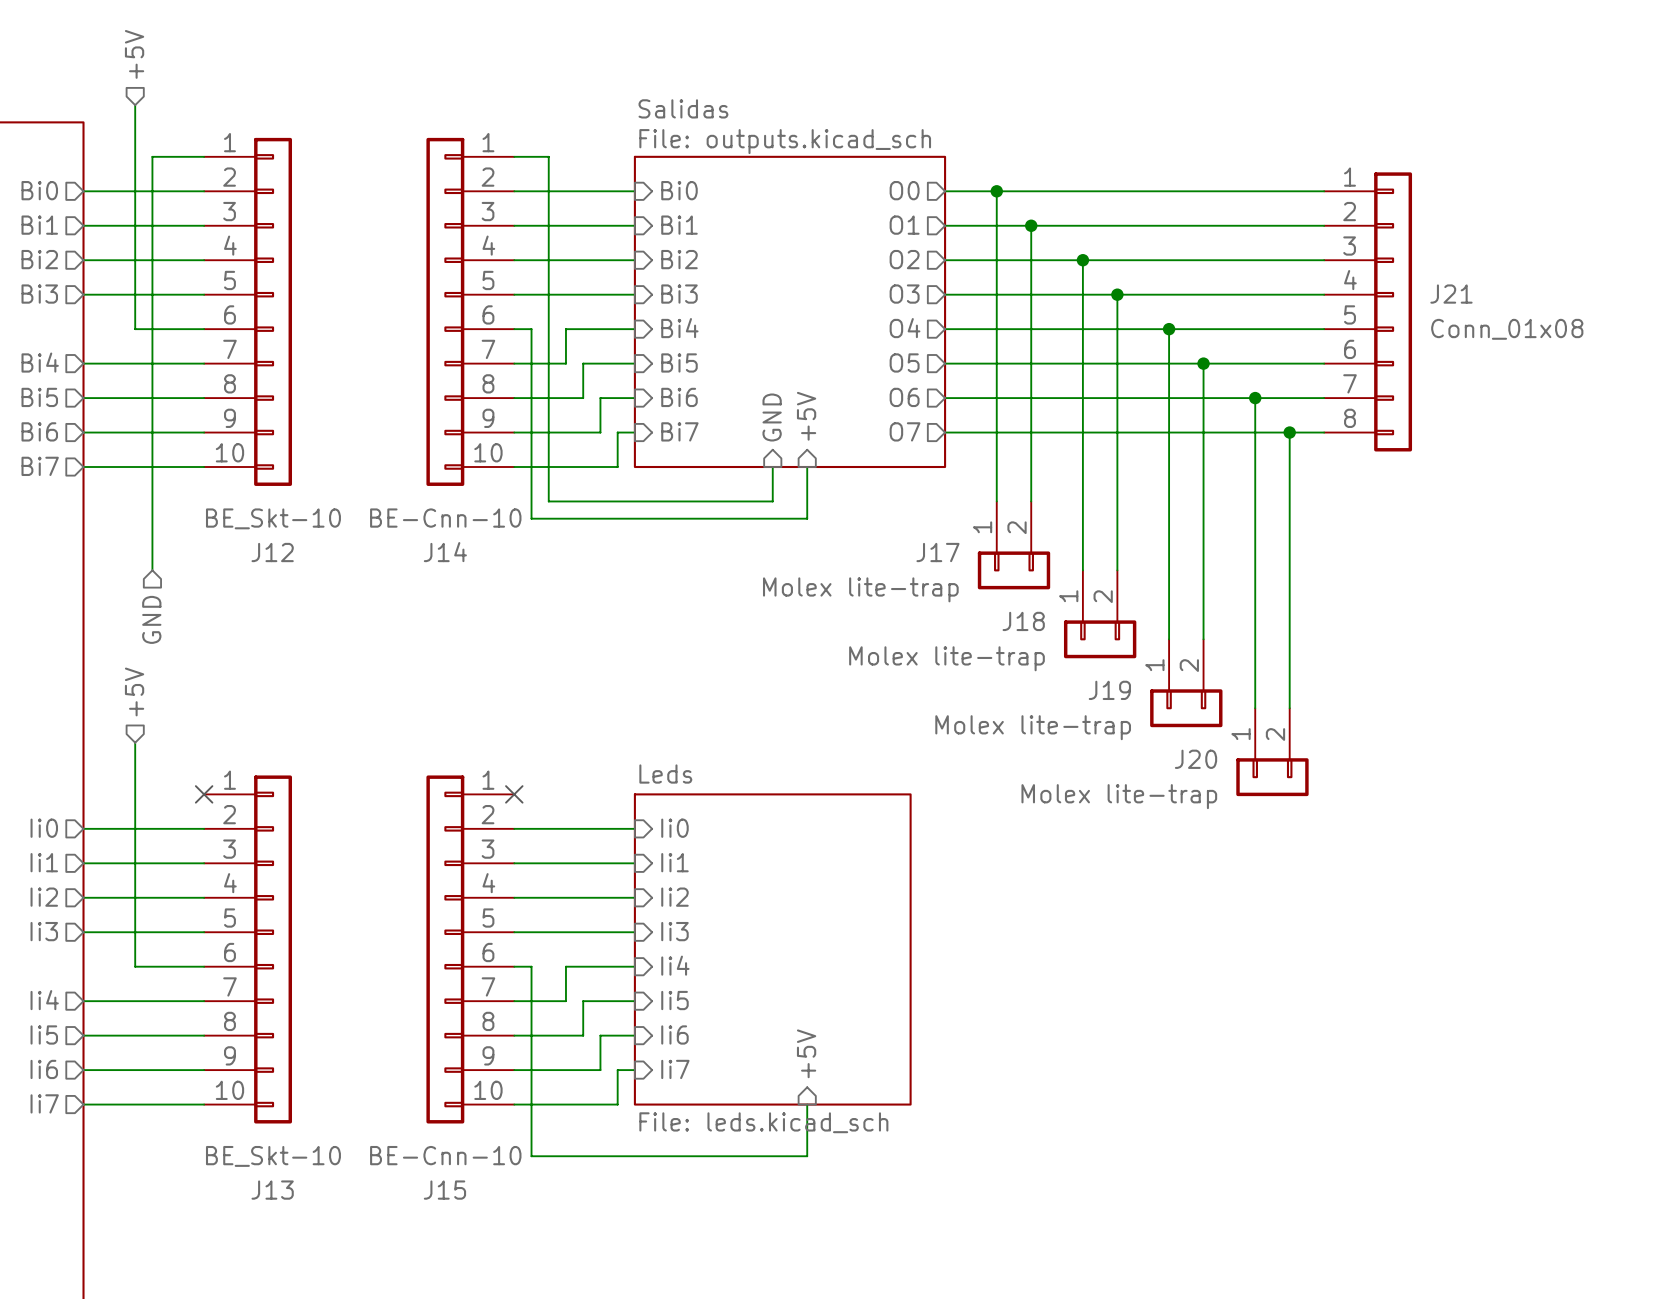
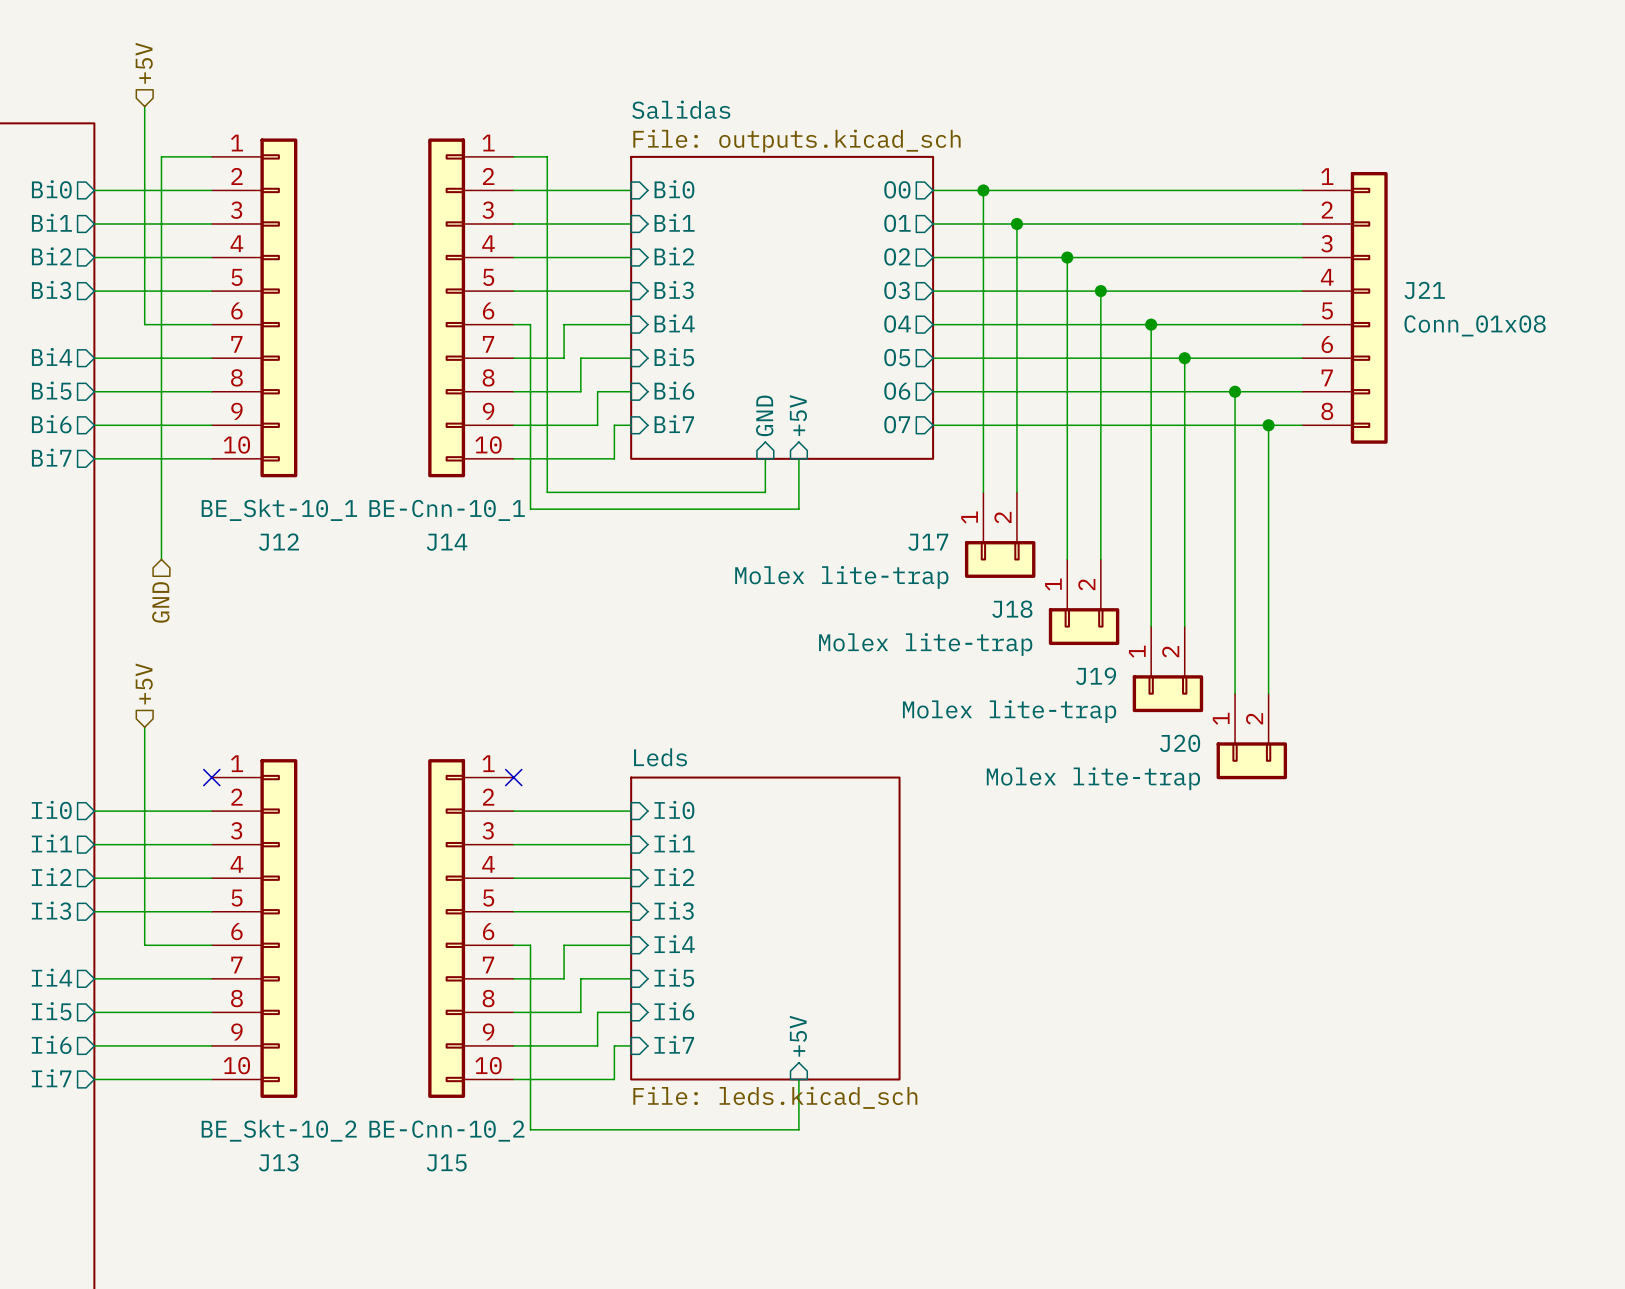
J12 value: BE_Skt-10 (273, 518) -> BE_Skt-10_1 (279, 510)
J14 value: BE-Cnn-10 (445, 518) -> BE-Cnn-10_1 (447, 510)
J15 value: BE-Cnn-10 (445, 1155) -> BE-Cnn-10_2 (446, 1131)
J13 value: BE_Skt-10 (273, 1156) -> BE_Skt-10_2 (279, 1130)

